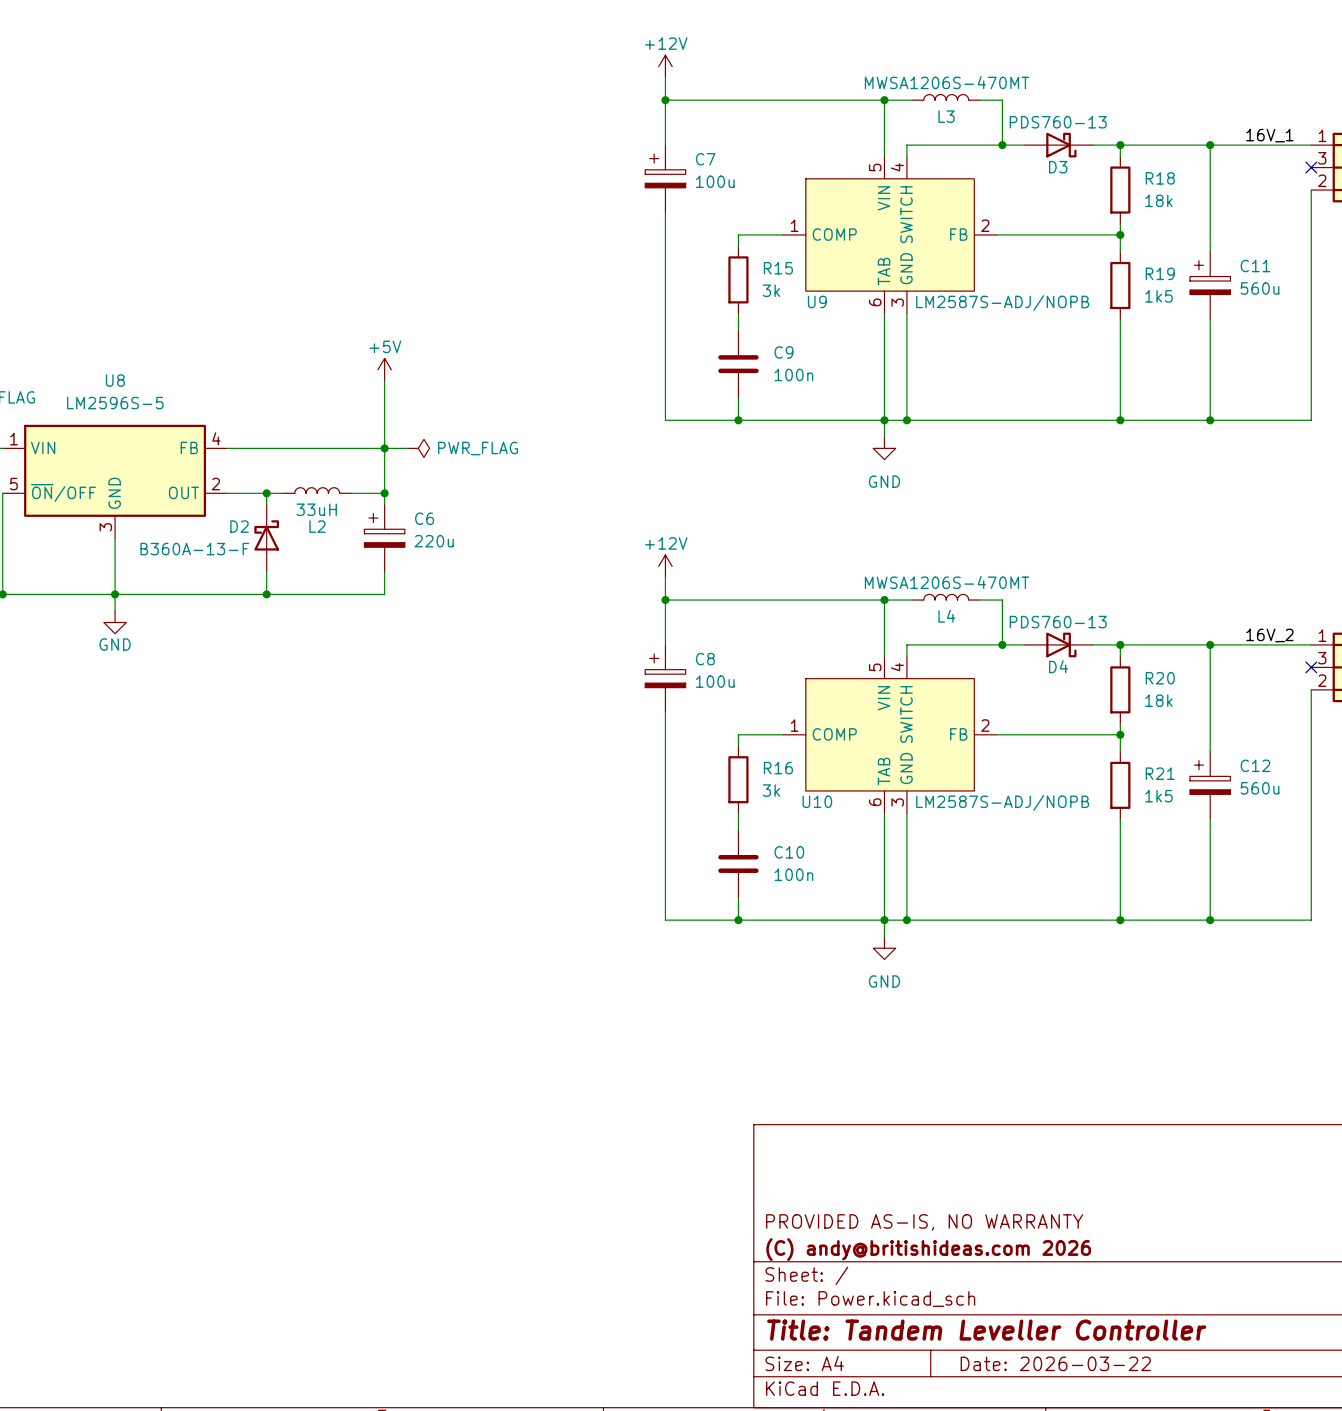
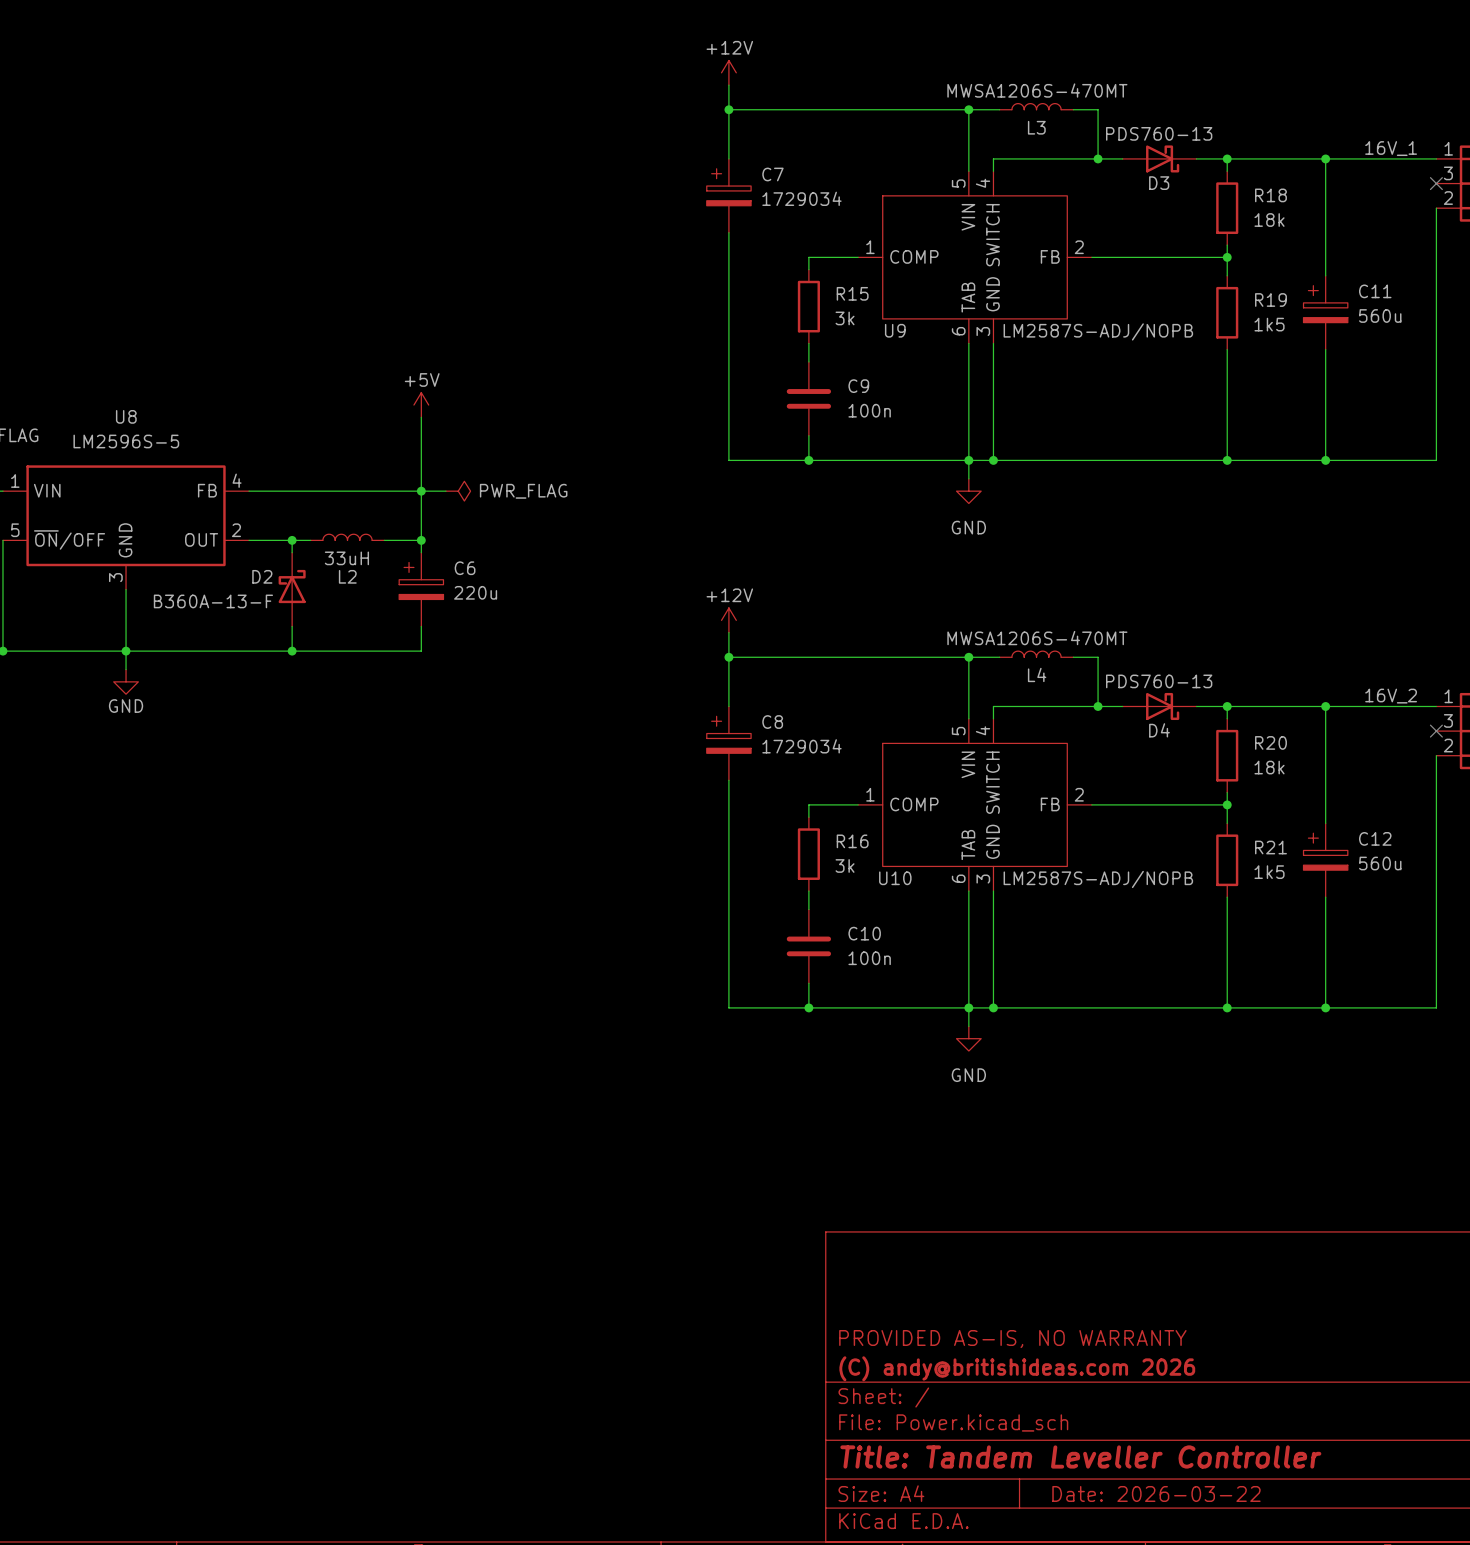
C7 value: 100u (715, 181) -> 1729034 (801, 198)
C8 value: 100u (715, 681) -> 1729034 (801, 746)

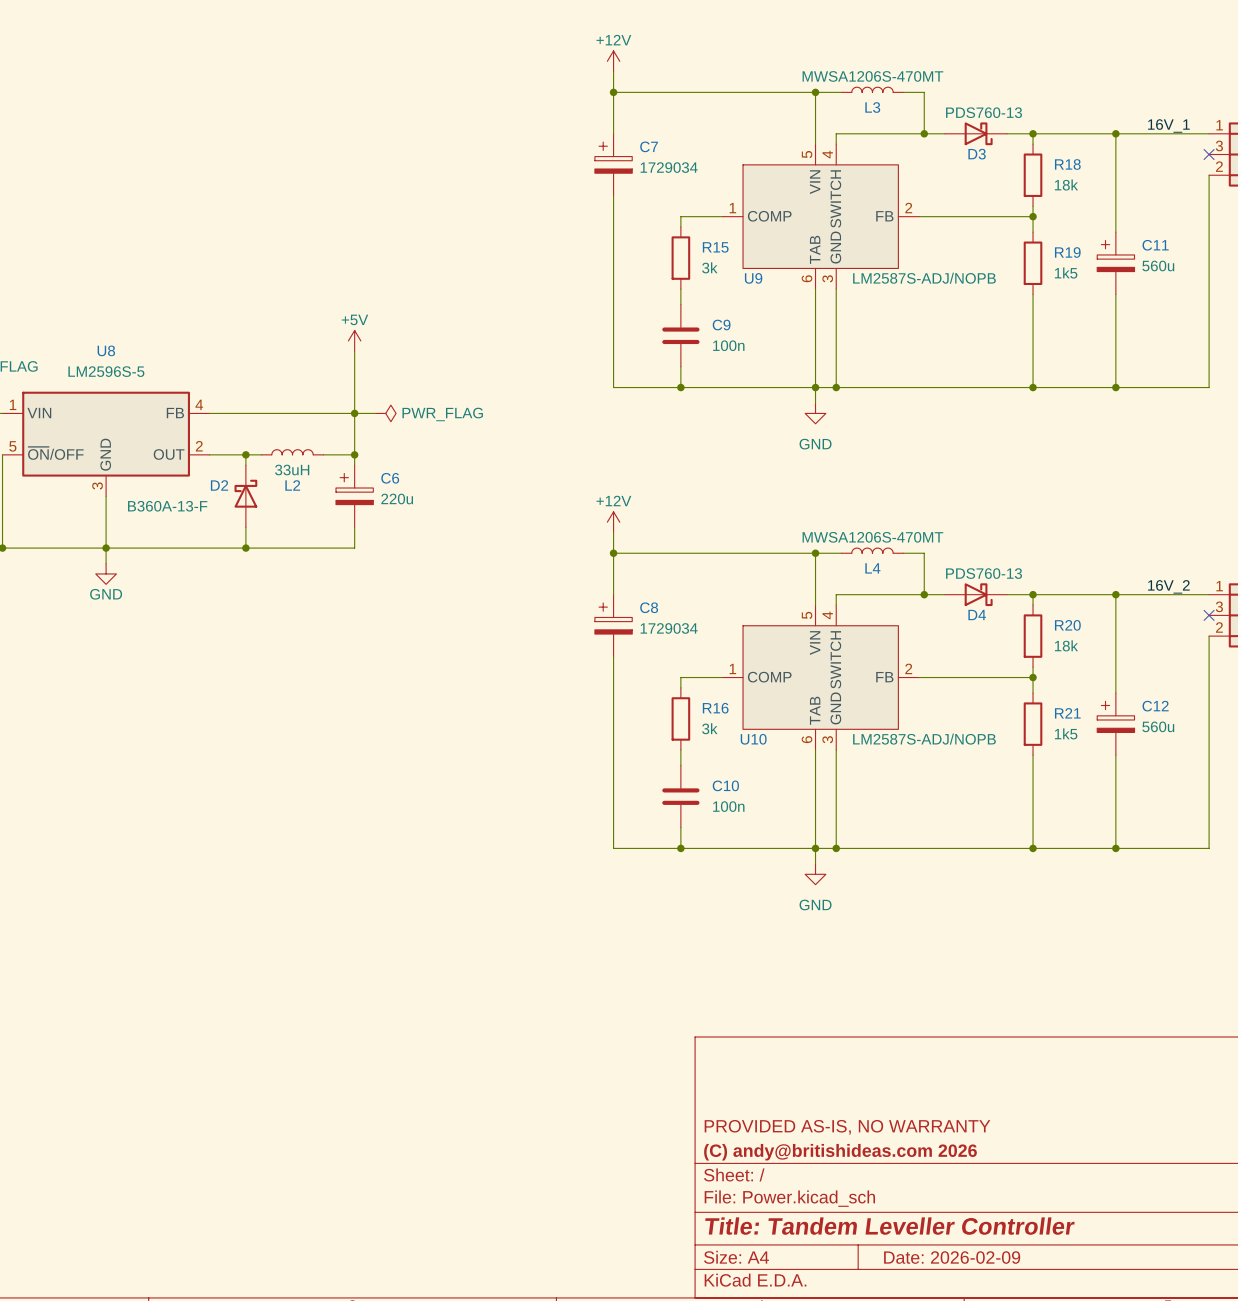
title block: Date: 2026-03-22 (1156, 1493) -> Date: 2026-02-09 (952, 1257)

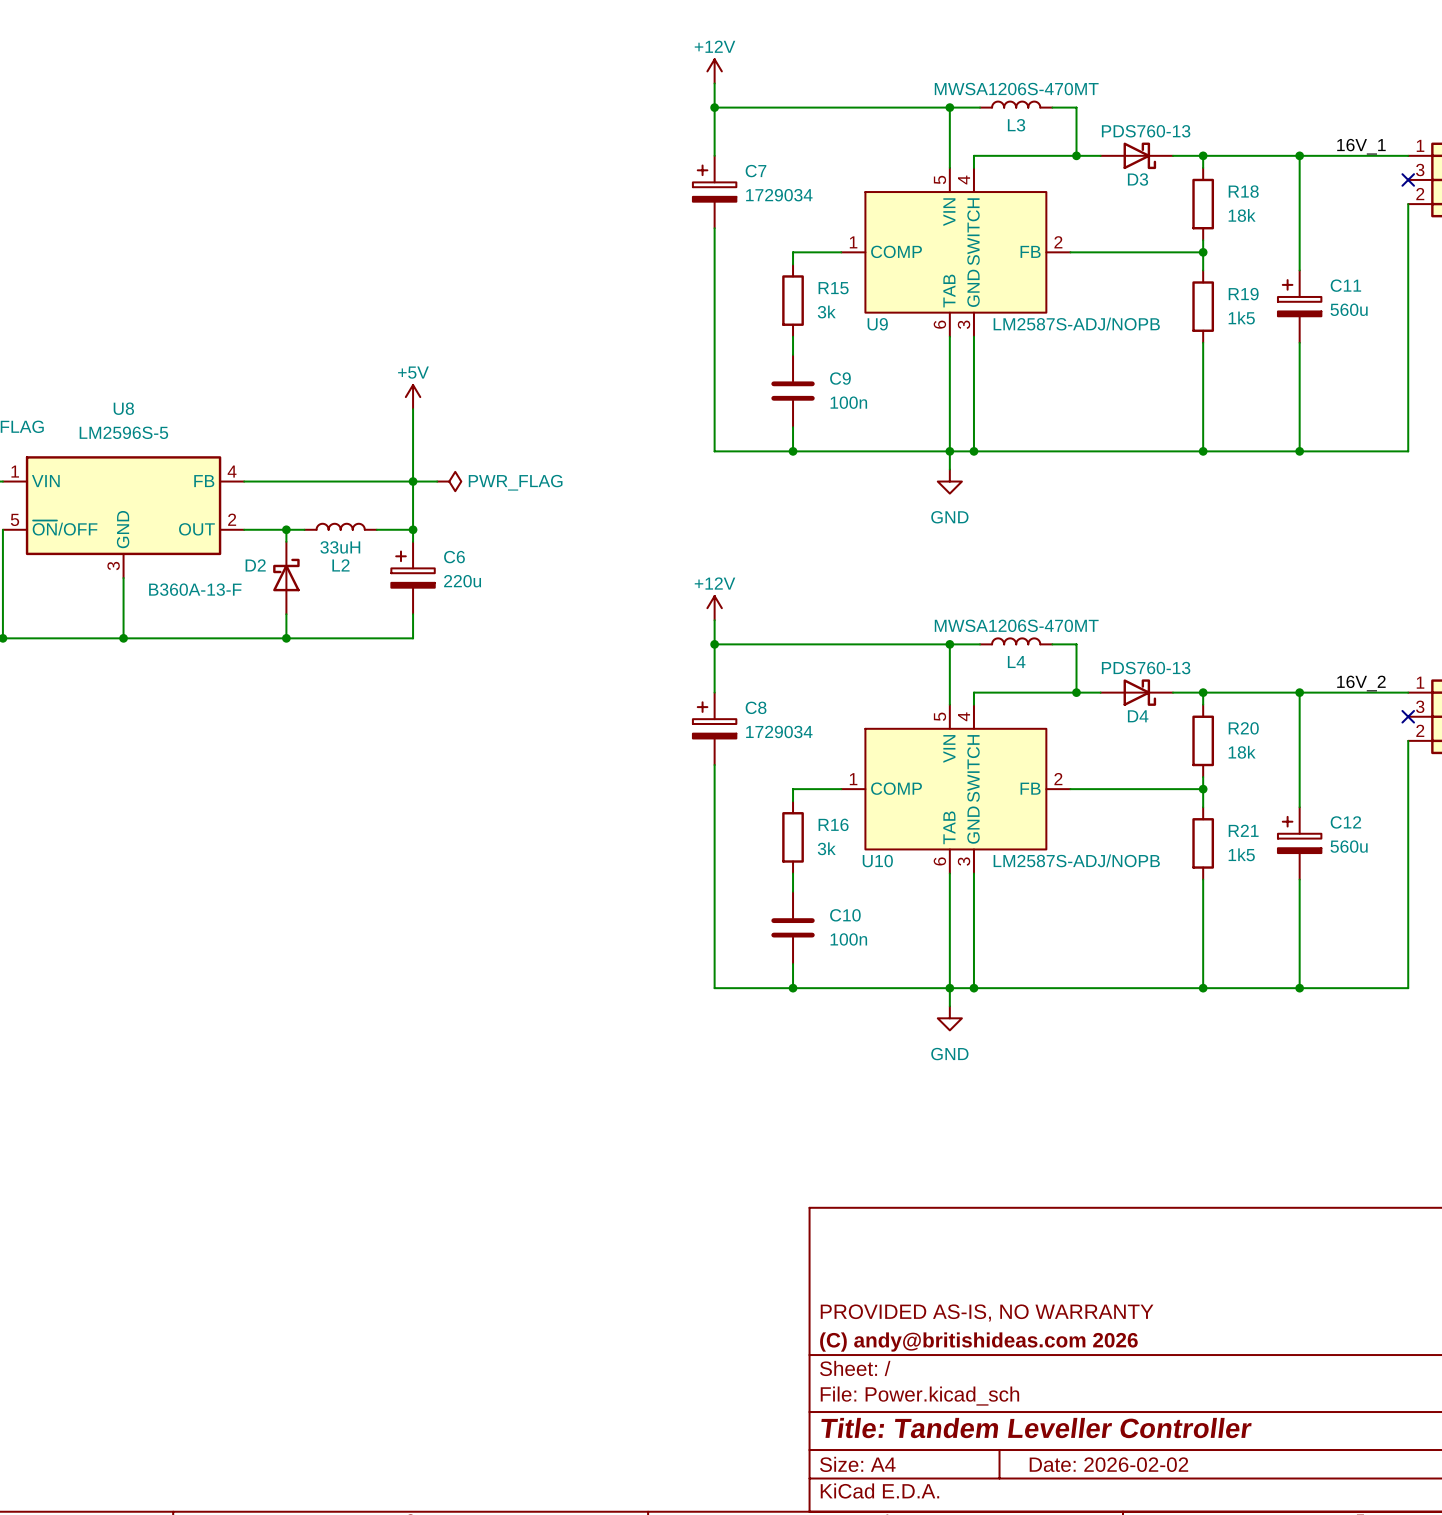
wire: (106, 548) (106, 563) -> none
power symbol: GND (106, 573) -> none
title block: Date: 2026-02-09 (952, 1257) -> Date: 2026-02-02 (1108, 1464)

